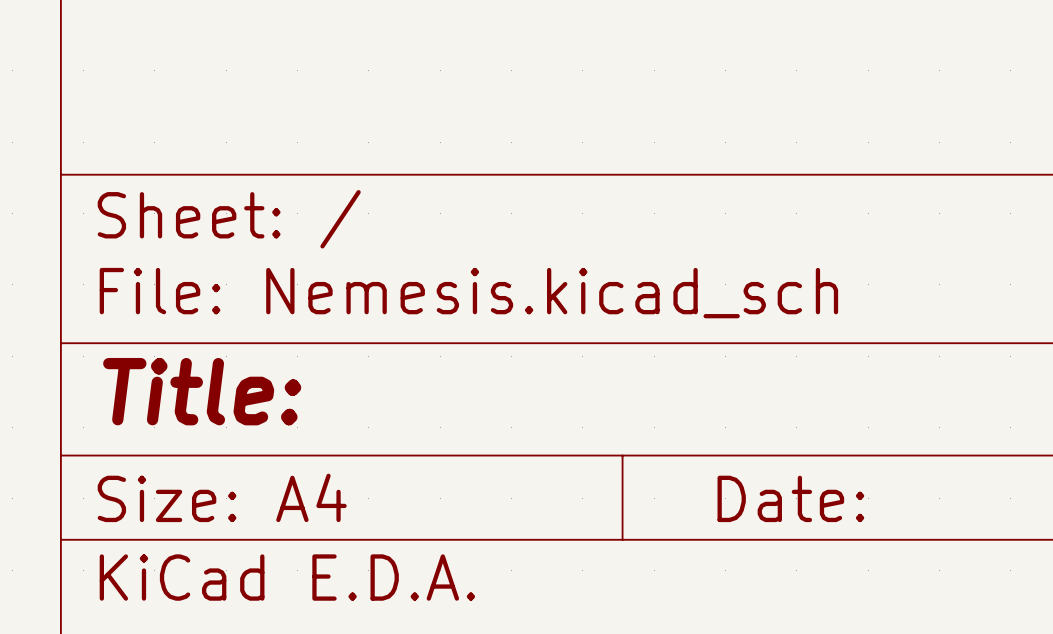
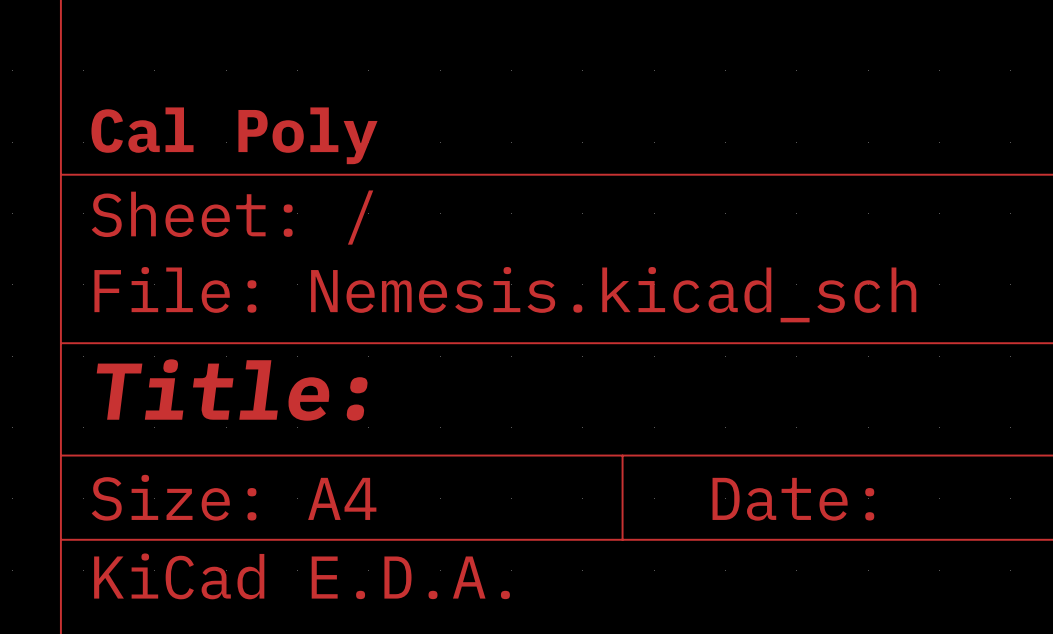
title block: none -> Cal Poly (234, 135)

